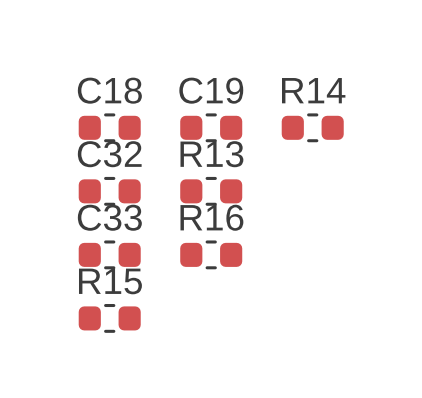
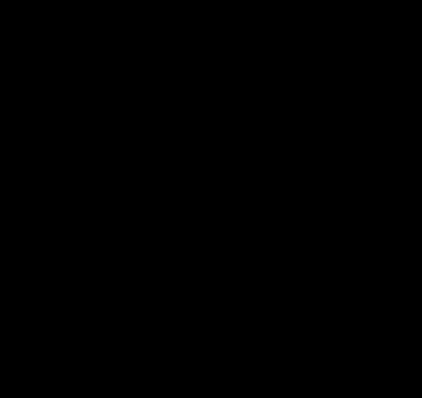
C18: (109, 127) -> none
C19: (211, 127) -> none
R14: (312, 127) -> none
C32: (109, 191) -> none
R13: (211, 191) -> none
C33: (109, 254) -> none
R16: (211, 254) -> none
R15: (109, 318) -> none

